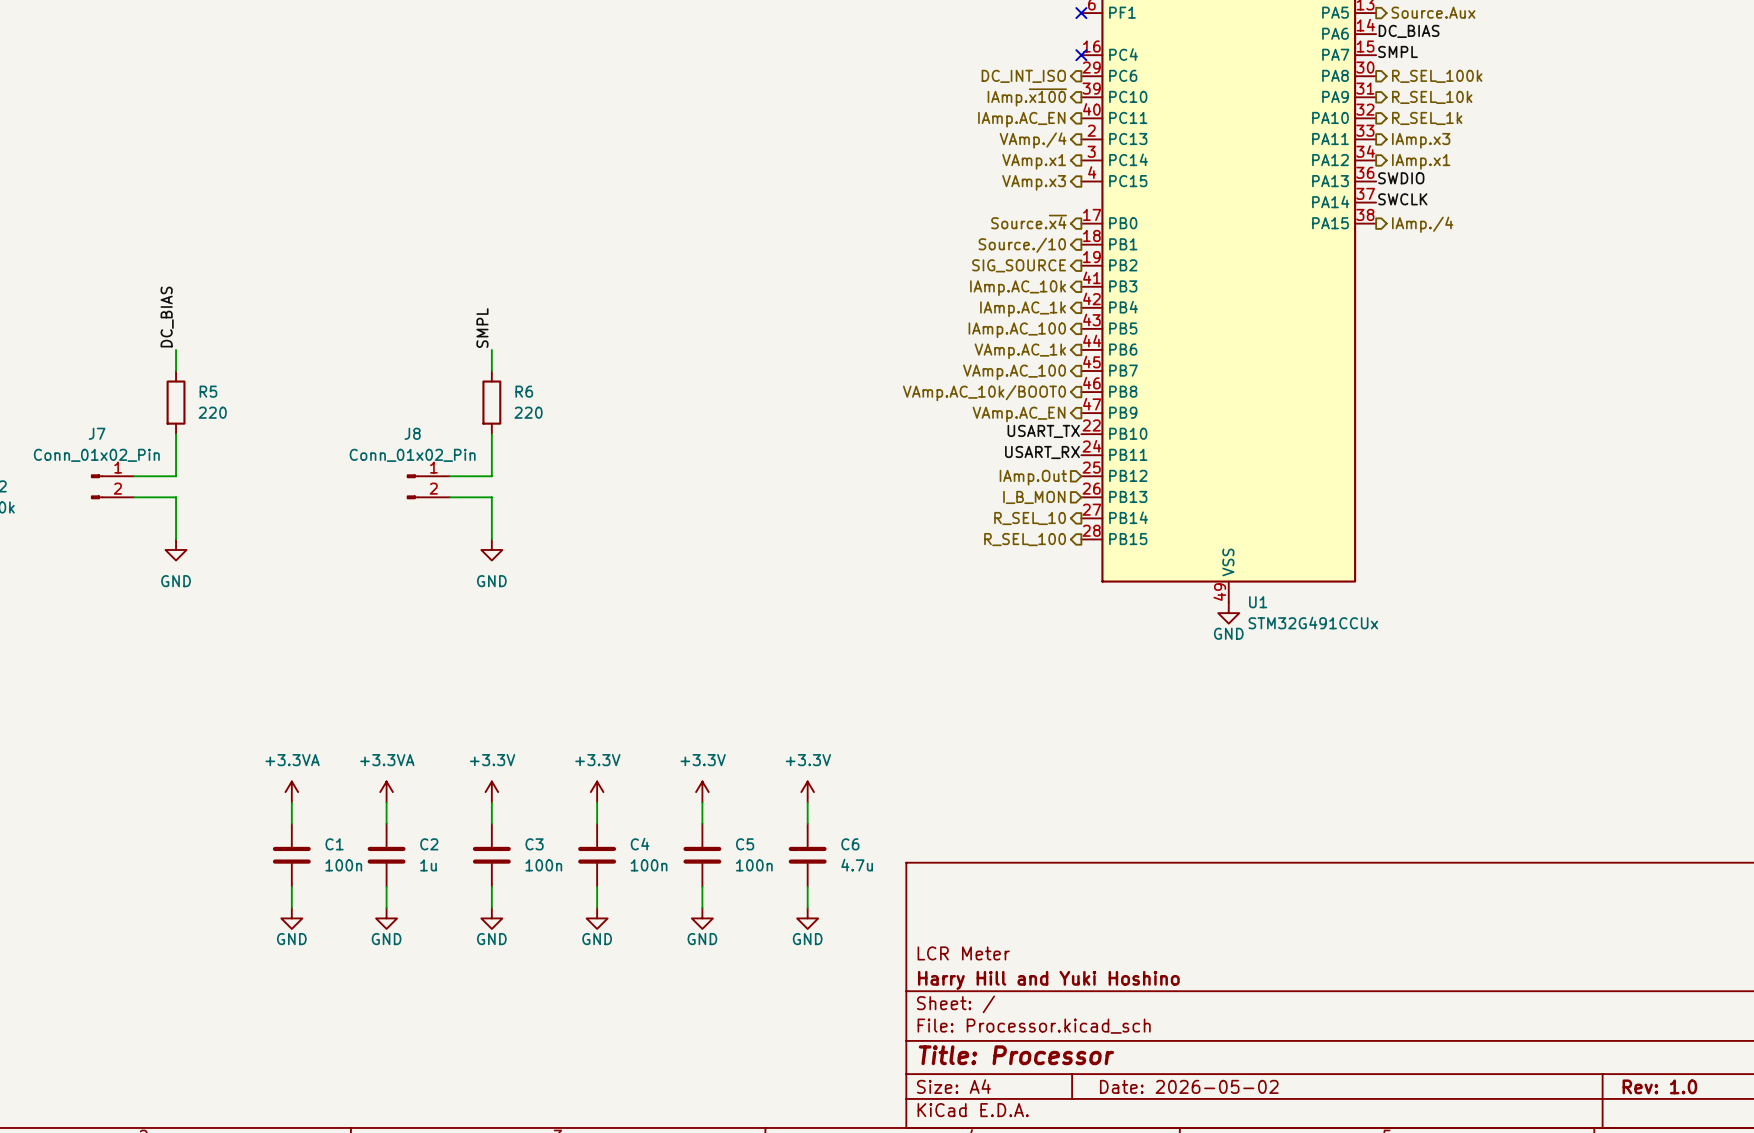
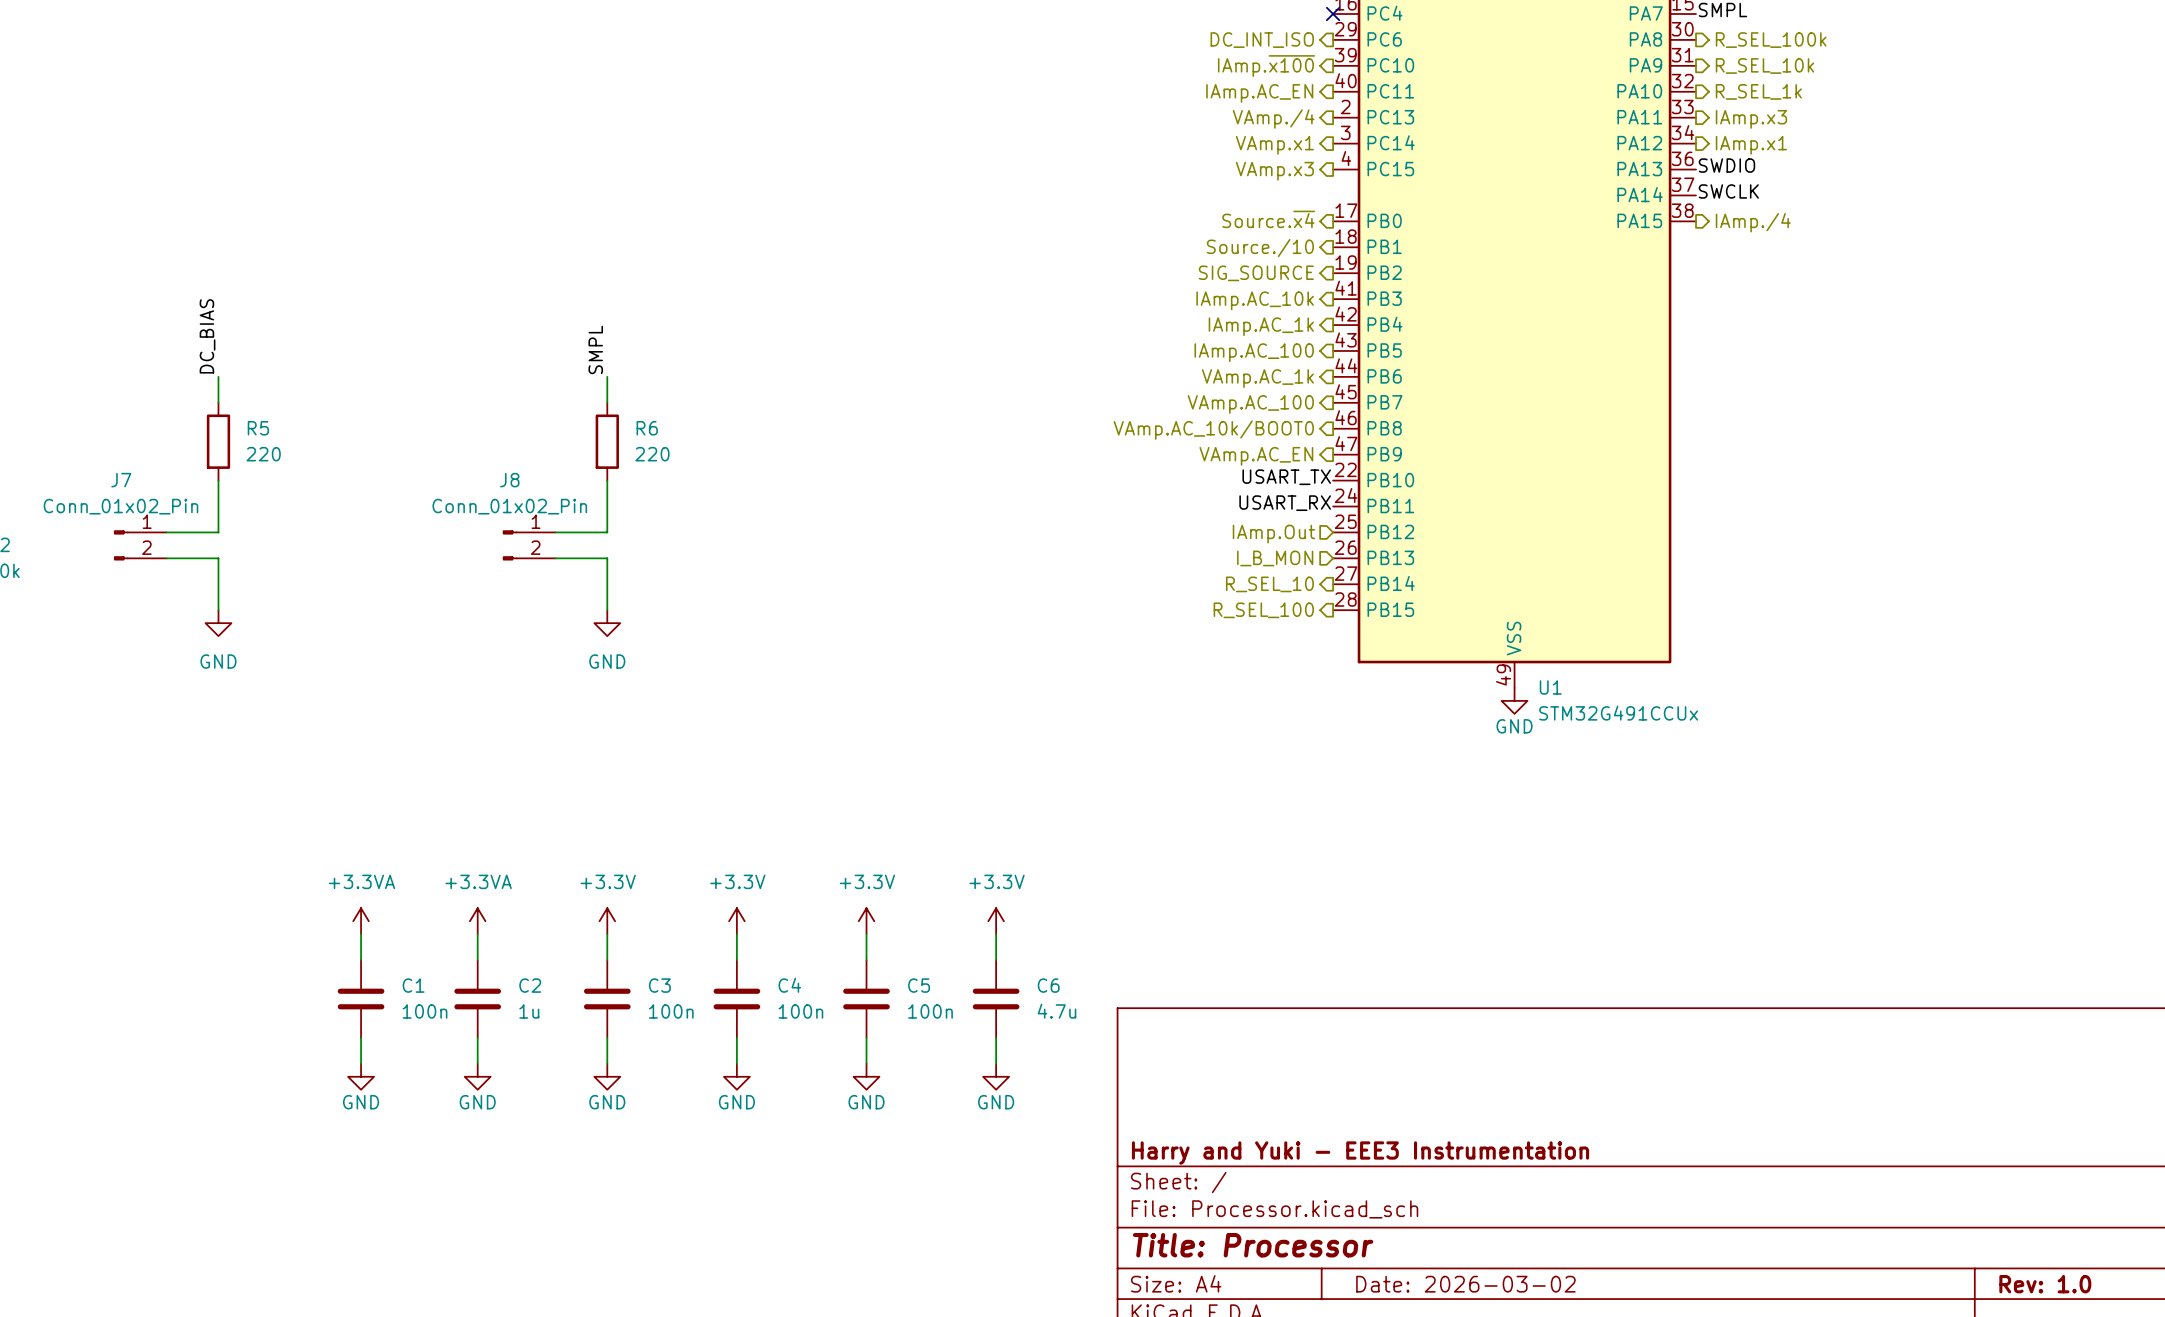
title block: LCR Meter (963, 953) -> none
title block: Harry Hill and Yuki Hoshino (1048, 980) -> Harry and Yuki - EEE3 Instrumentation (1360, 1153)
title block: Date: 2026-05-02 (1189, 1086) -> Date: 2026-03-02 (1465, 1284)

